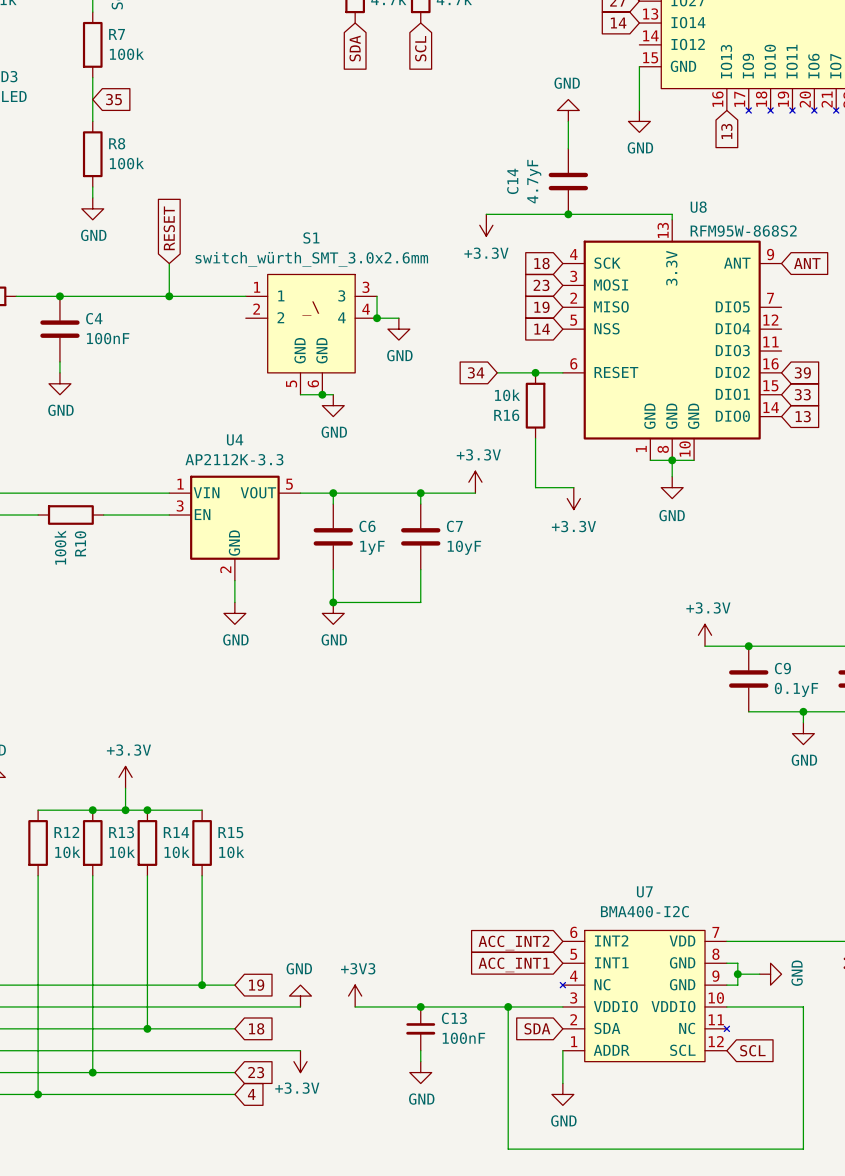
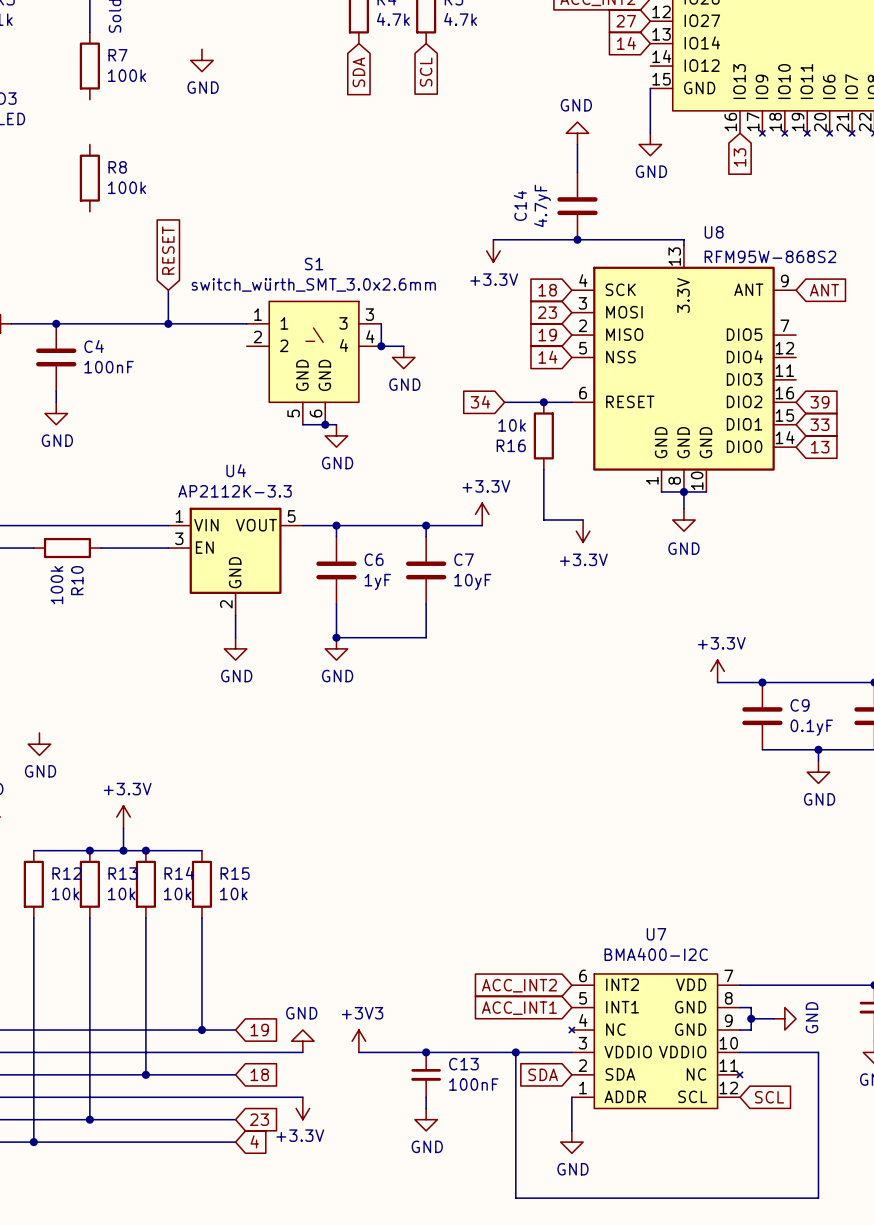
power symbol: none -> GND (201, 60)
wire: (92, 77) (92, 121) -> none
global label: 35 (113, 99) -> none
wire: (92, 187) (92, 197) -> none
power symbol: GND (92, 208) -> none
power symbol: none -> GND (39, 744)

